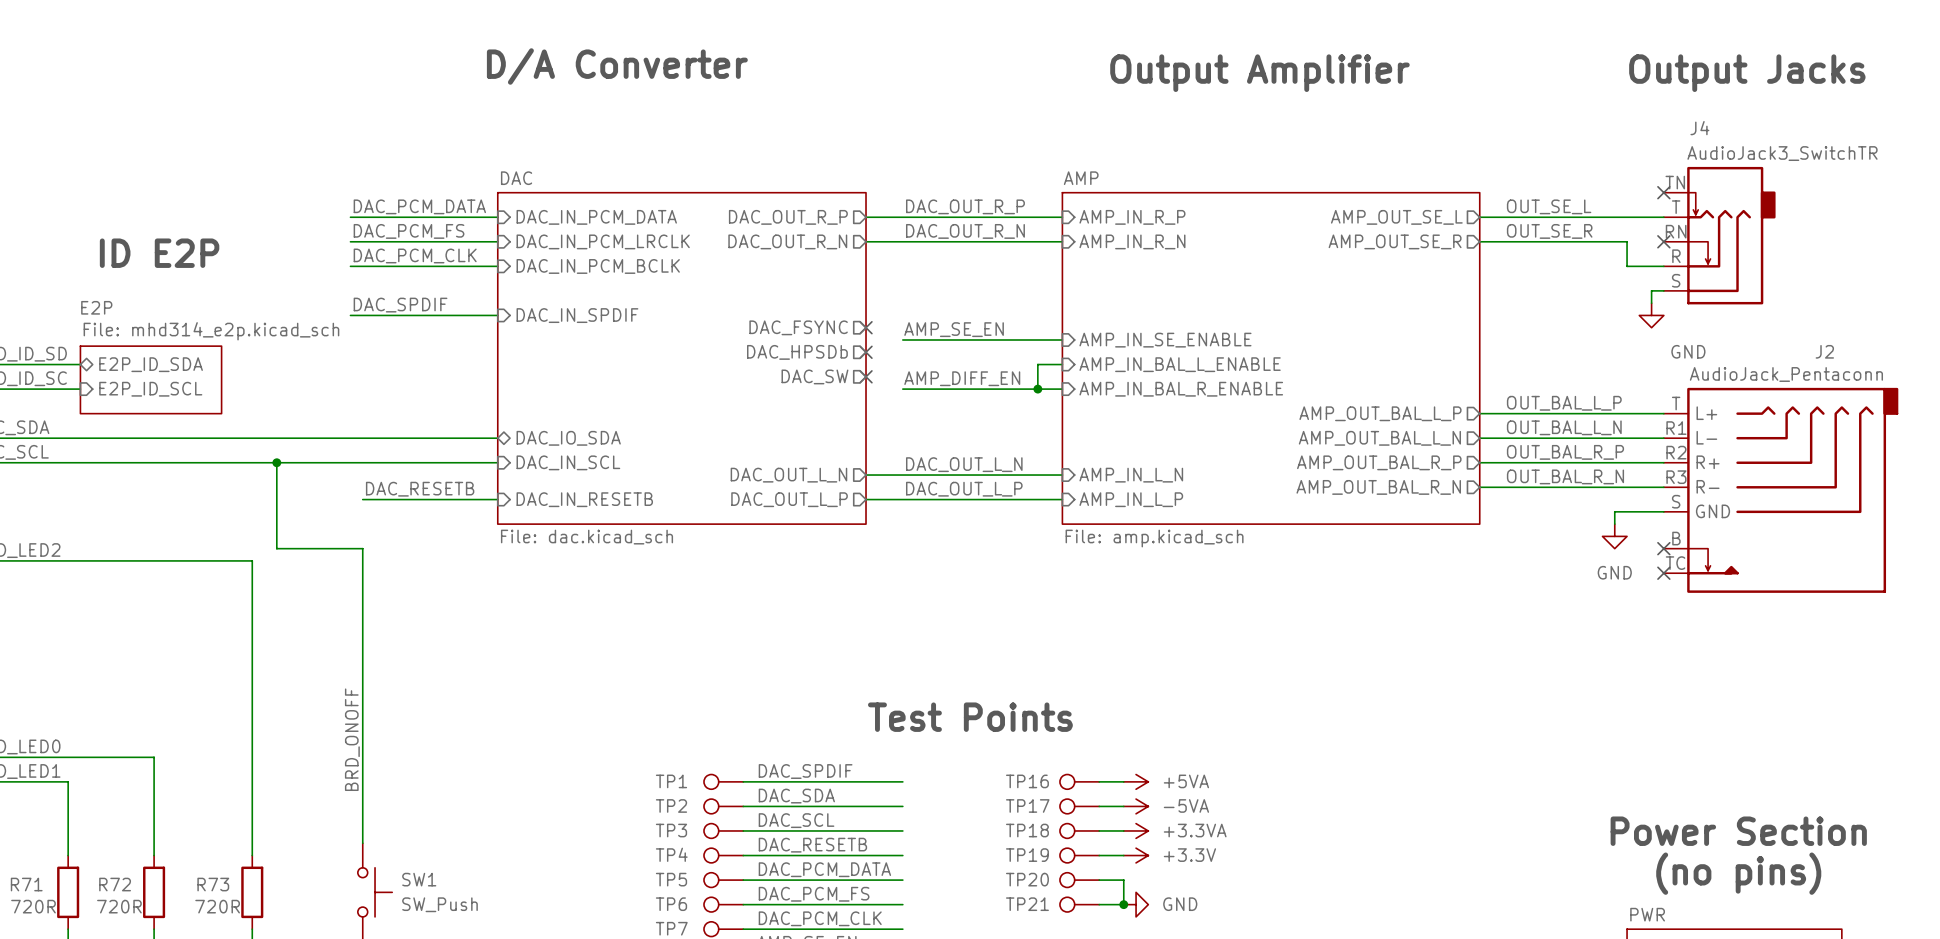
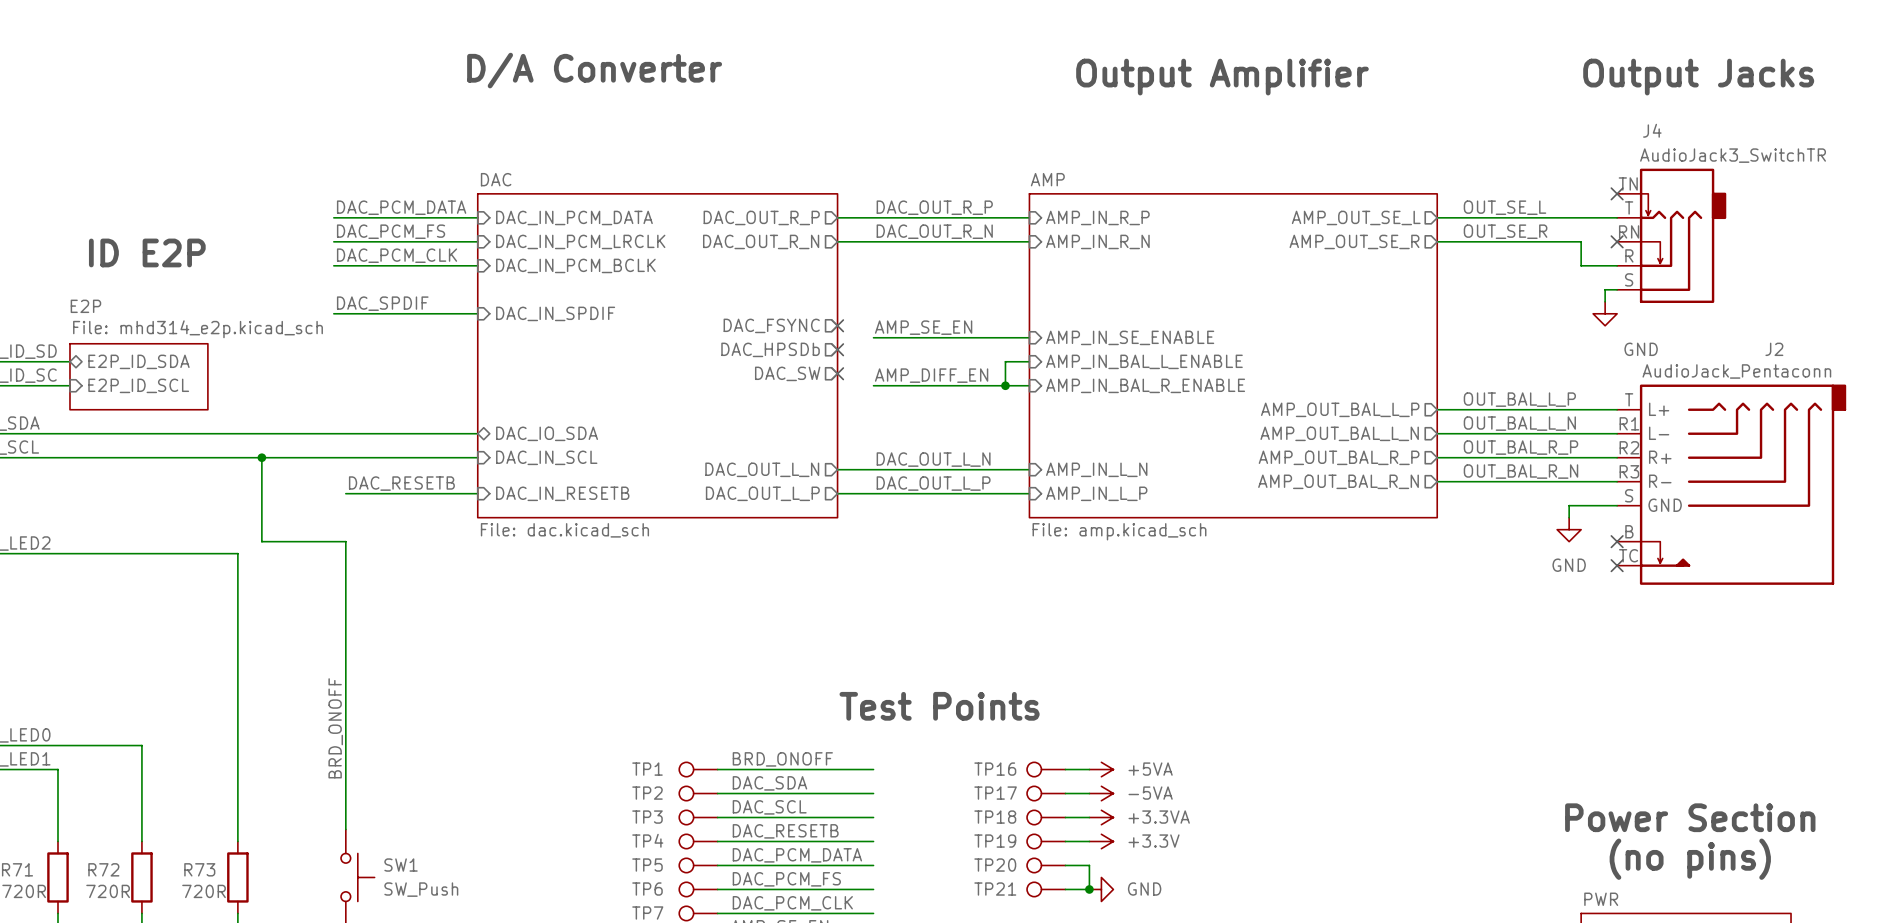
label: DAC_SPDIF (805, 771) -> BRD_ONOFF (782, 759)

